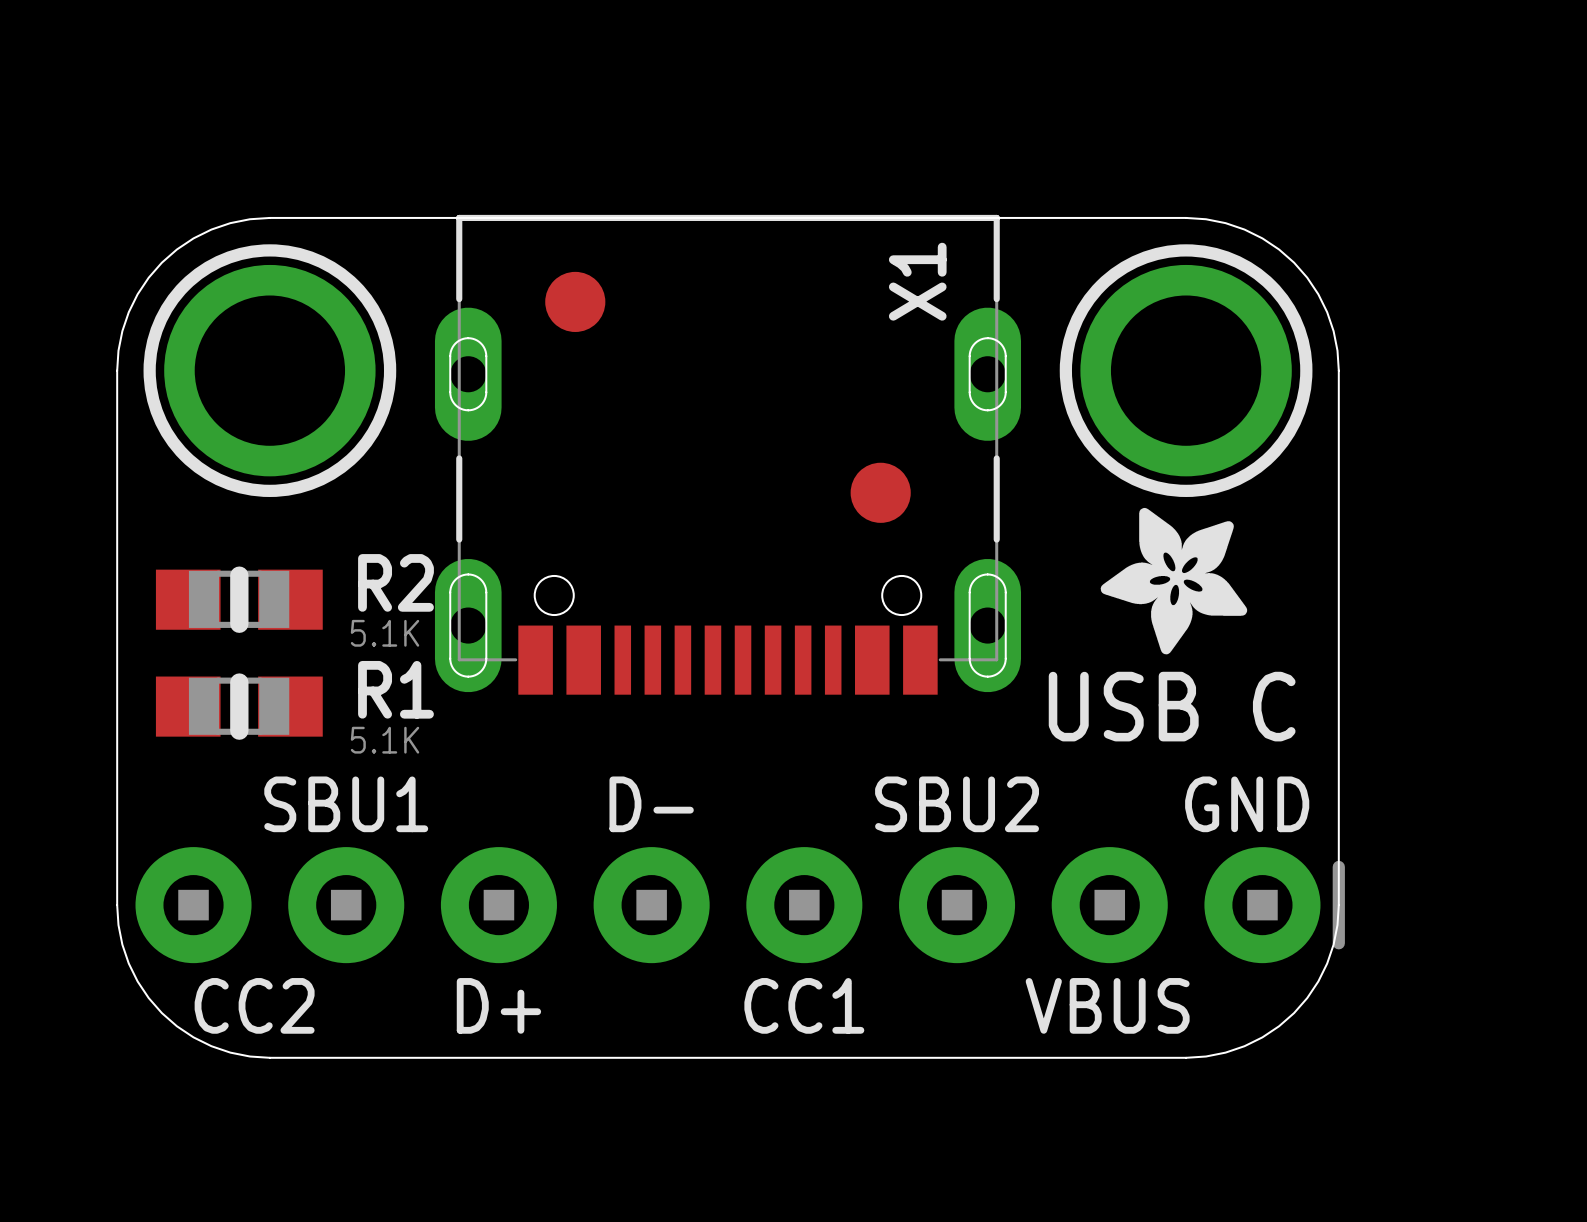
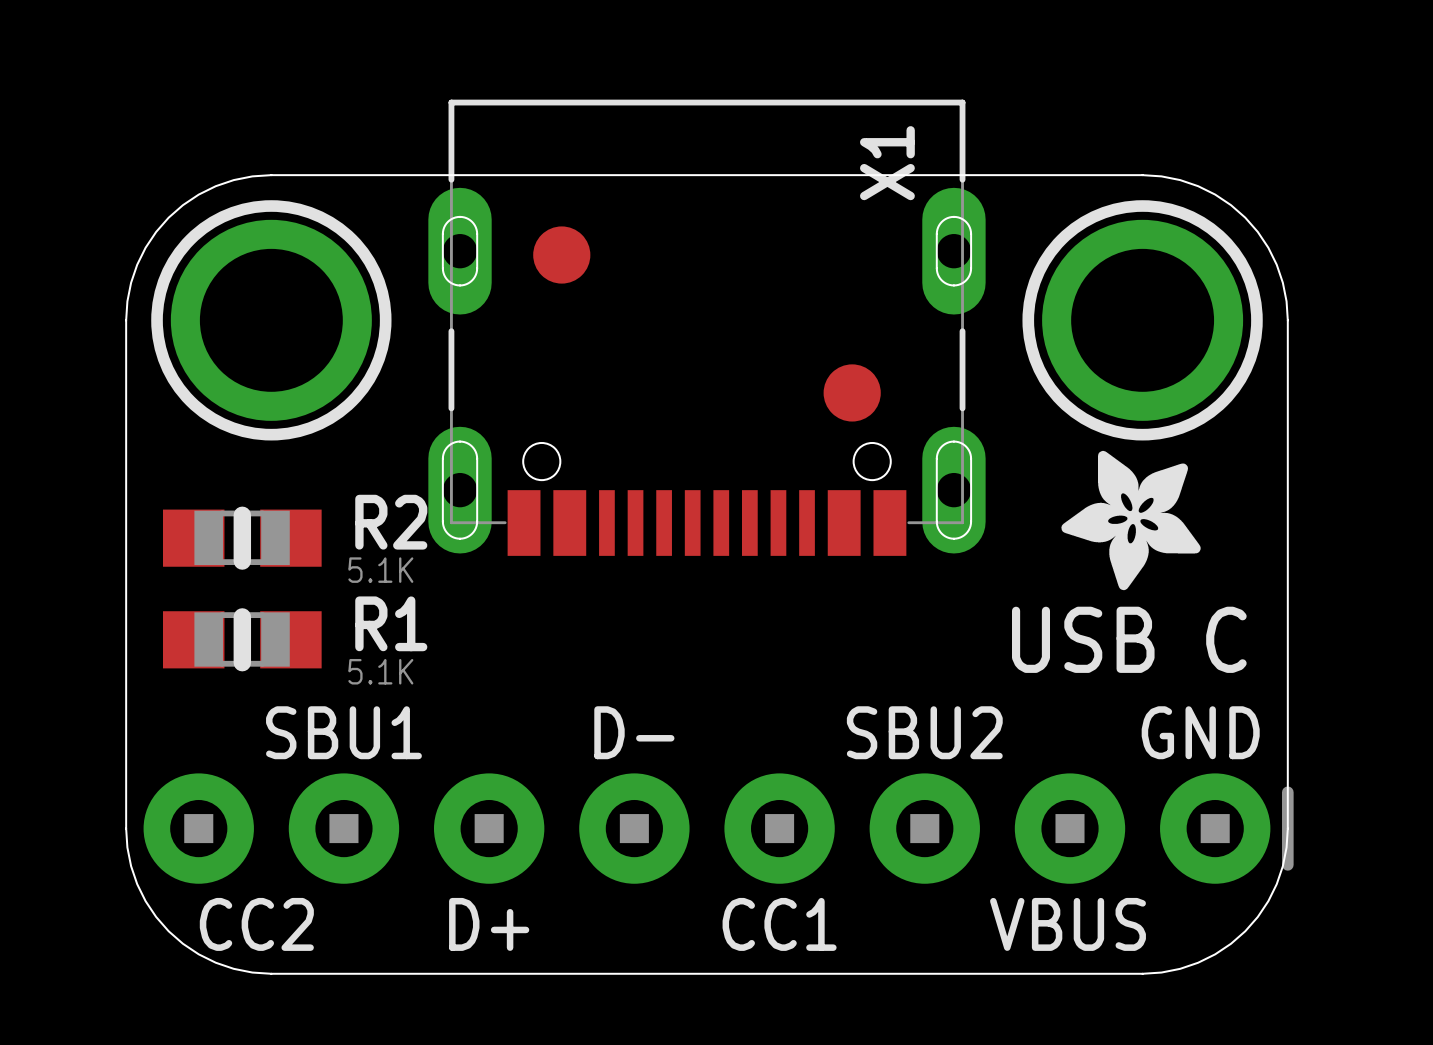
X1 position: (727, 454) -> (706, 327)
part position: (880, 492) -> (852, 392)

